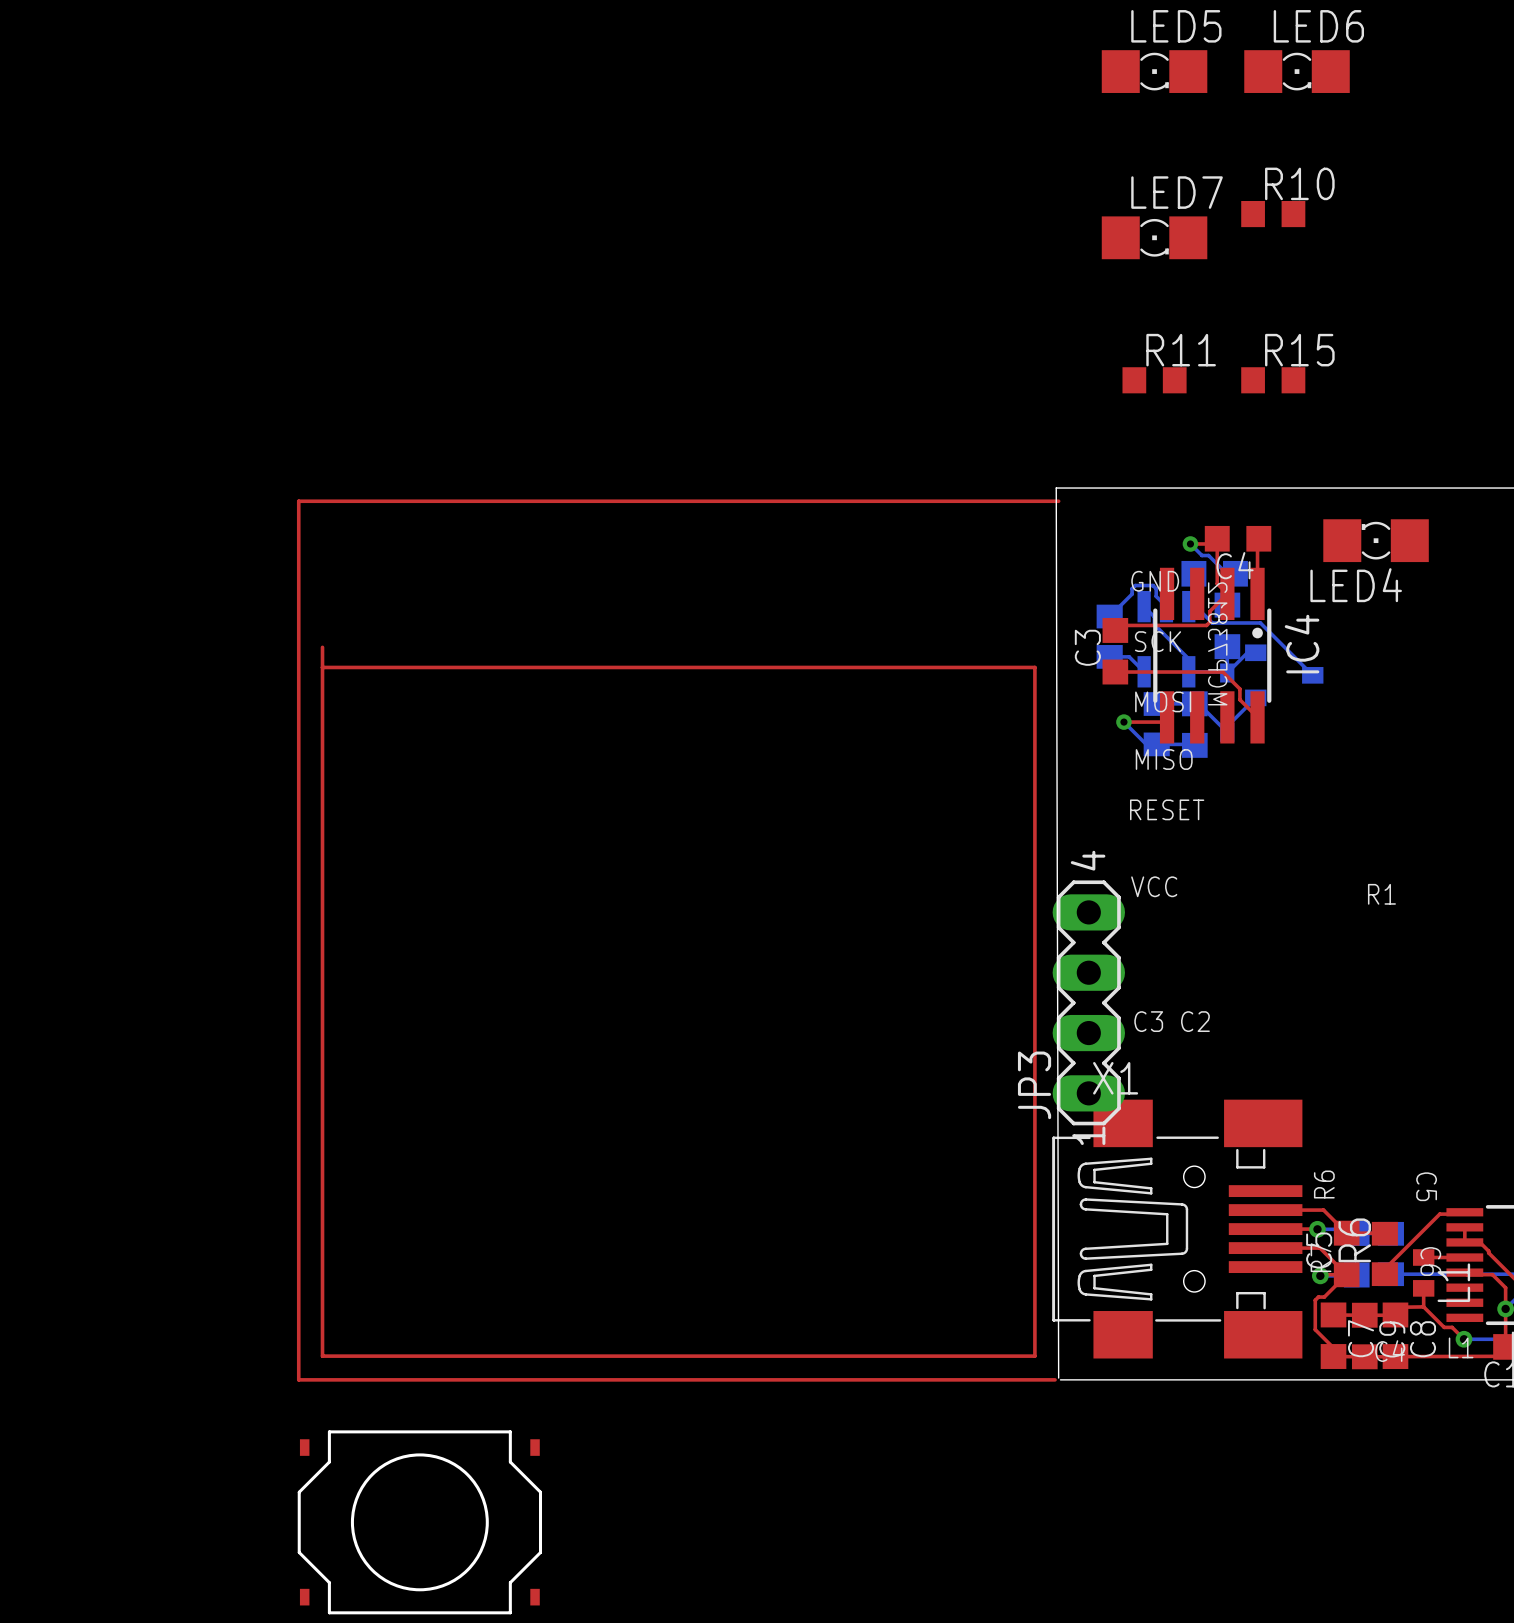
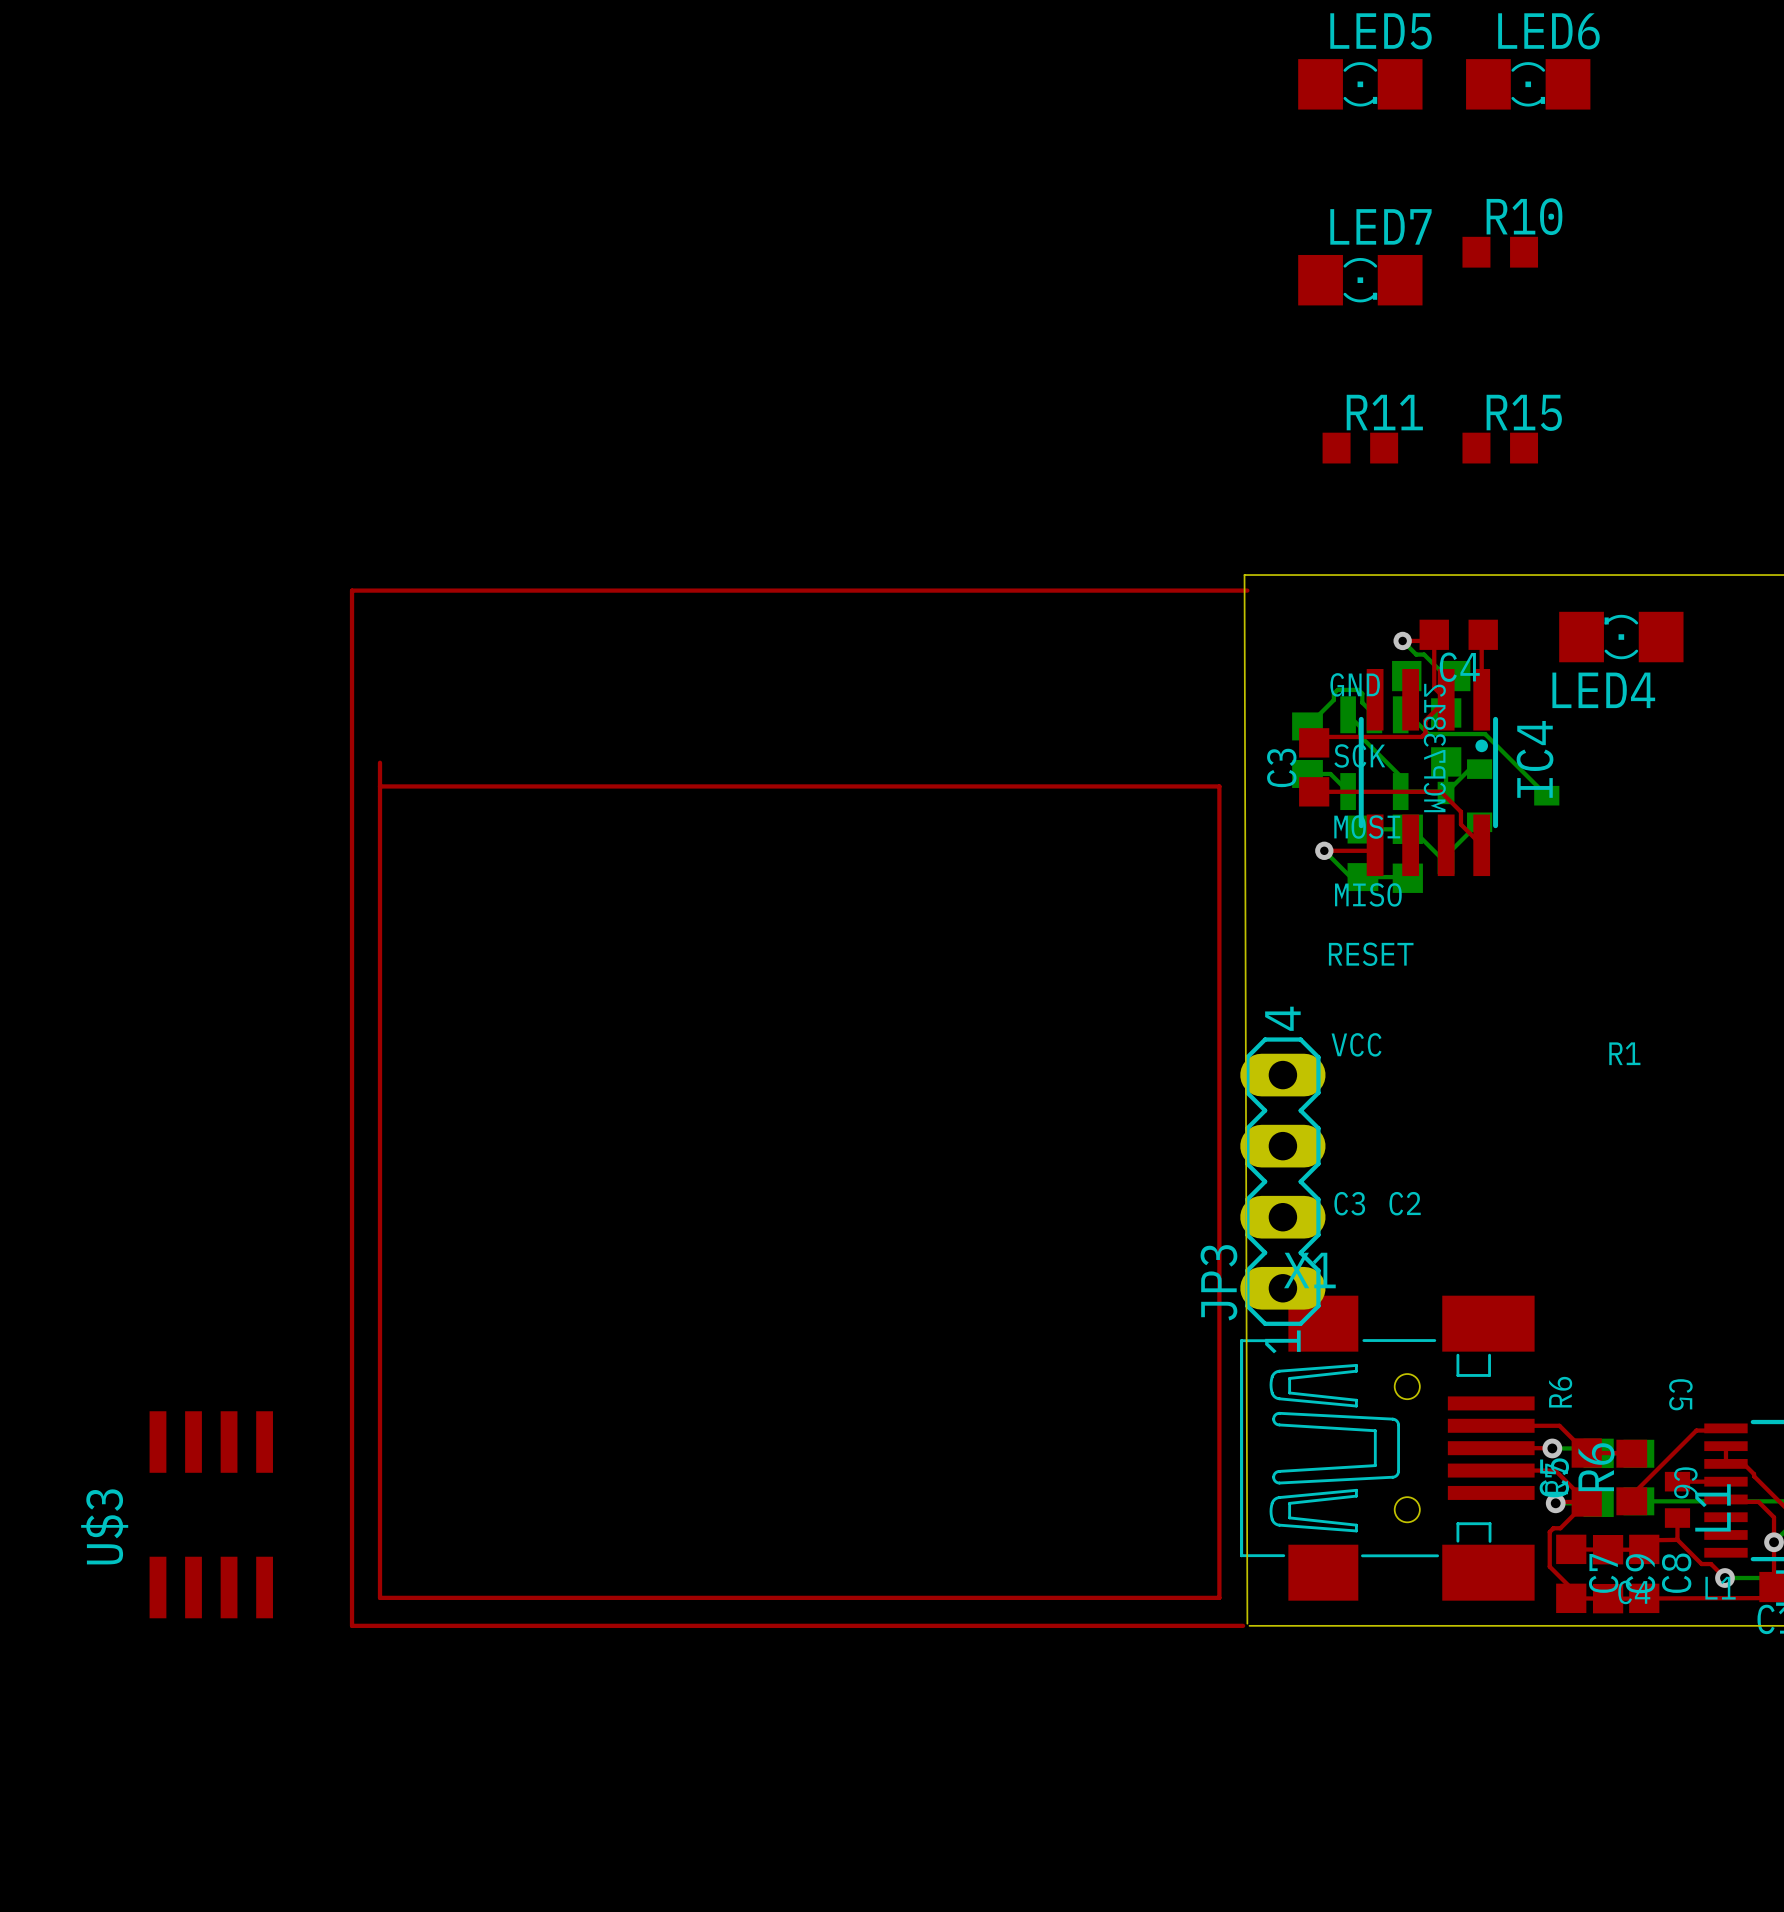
U$3: none -> (211, 1514)
part: (419, 1522) -> none

